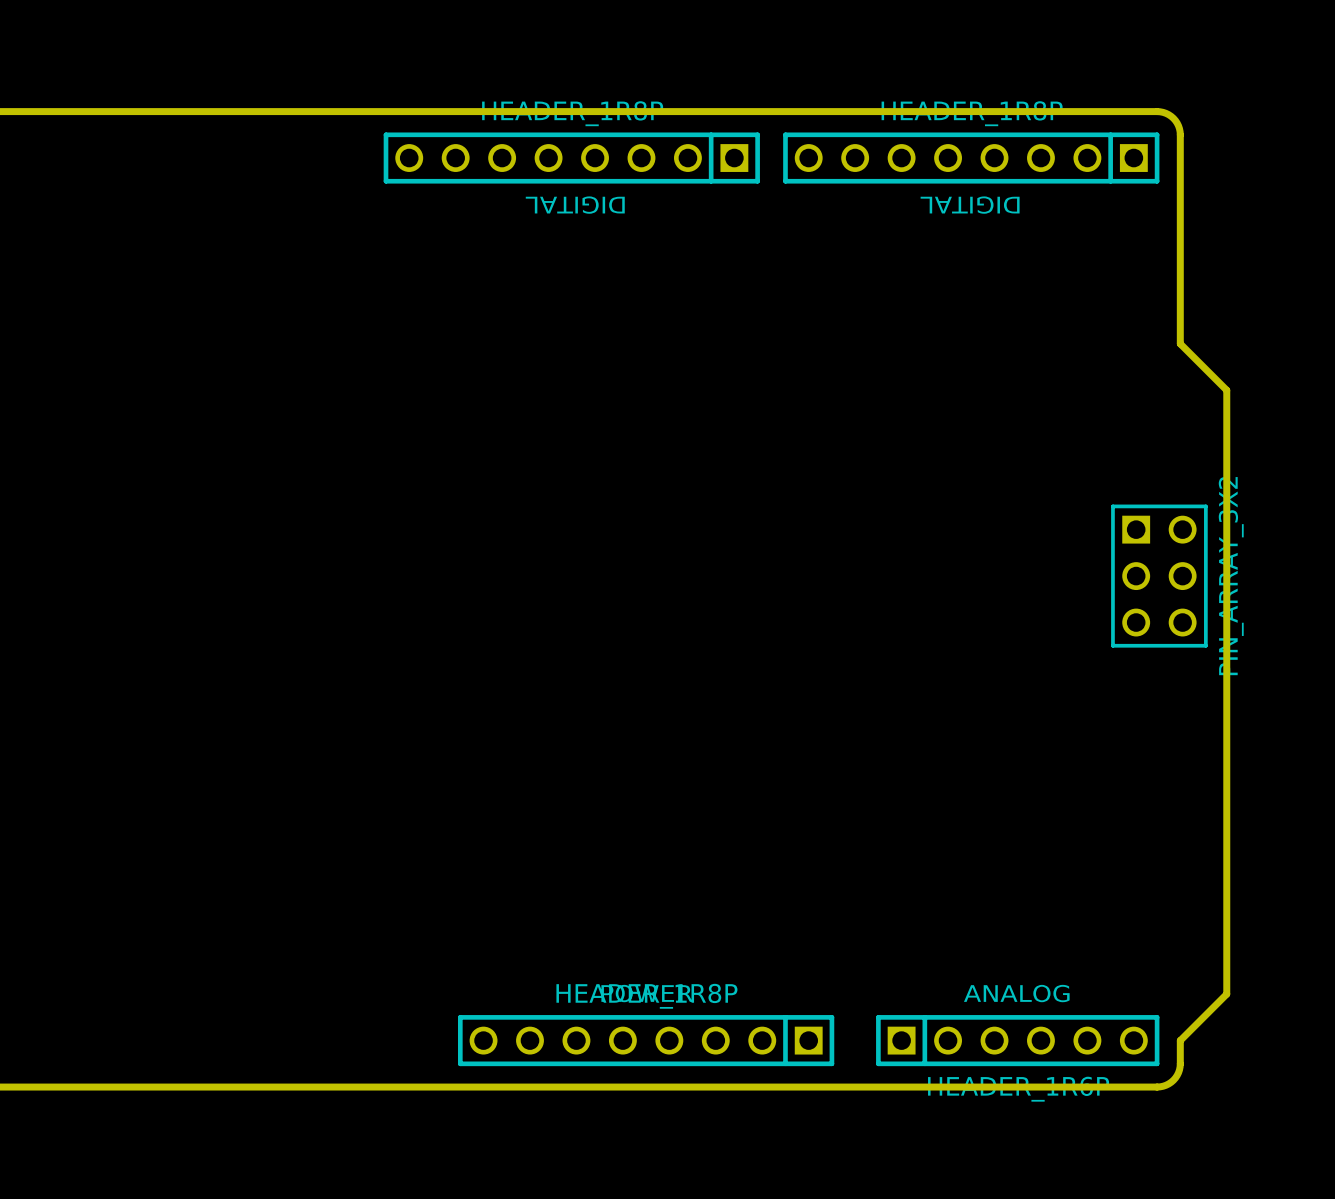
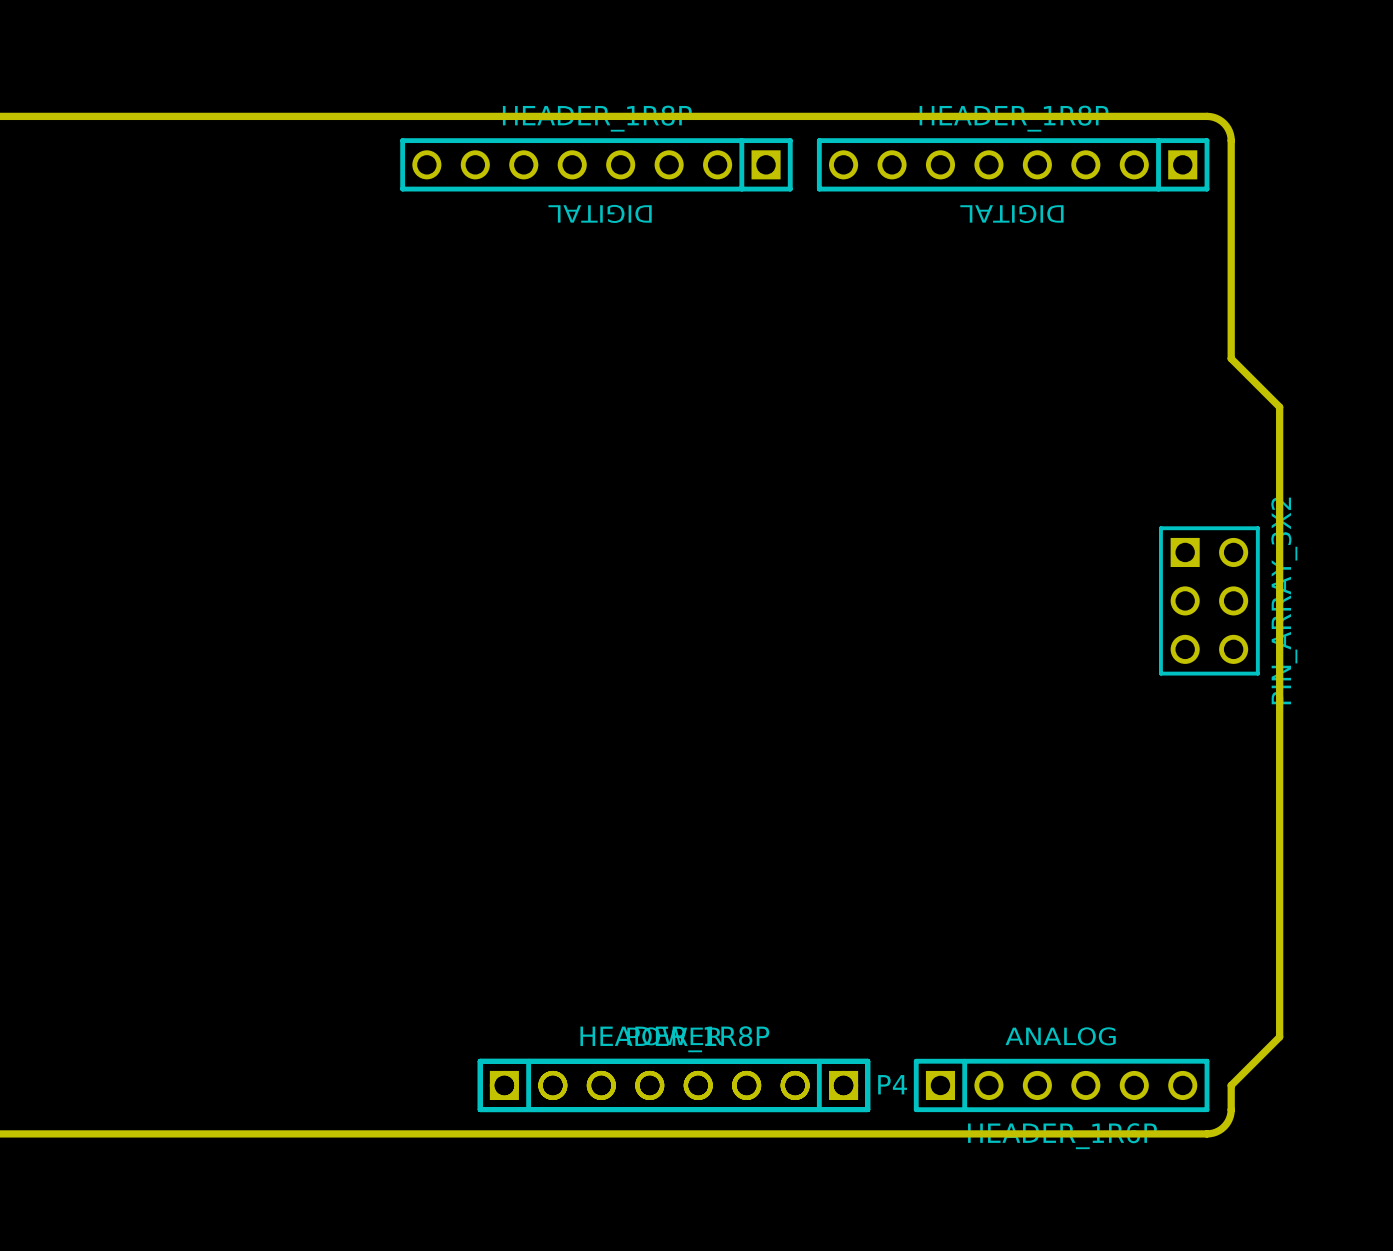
P4: none -> (673, 1085)

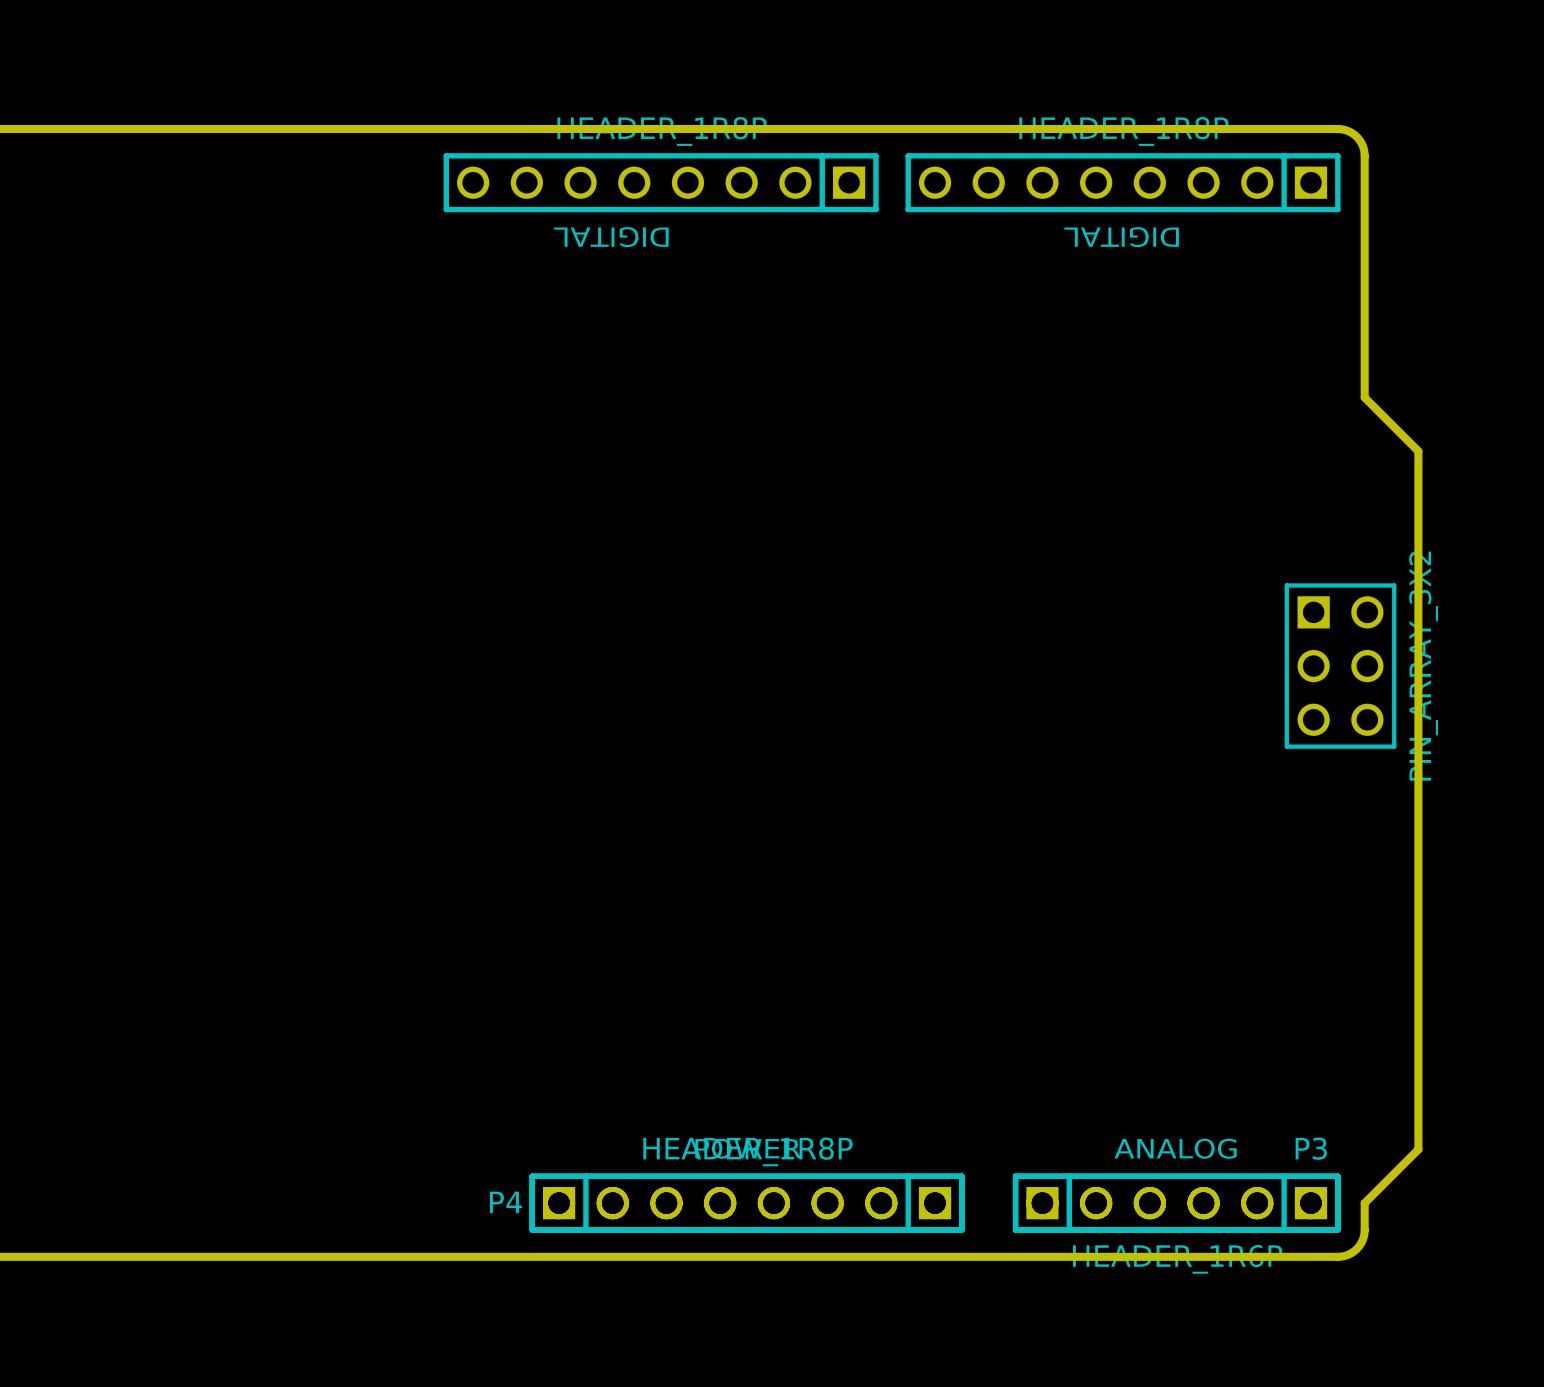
text position: DIGITAL (600, 213) -> DIGITAL (611, 237)
P4 name position: P4 (892, 1084) -> P4 (505, 1202)
P3: none -> (1176, 1203)

